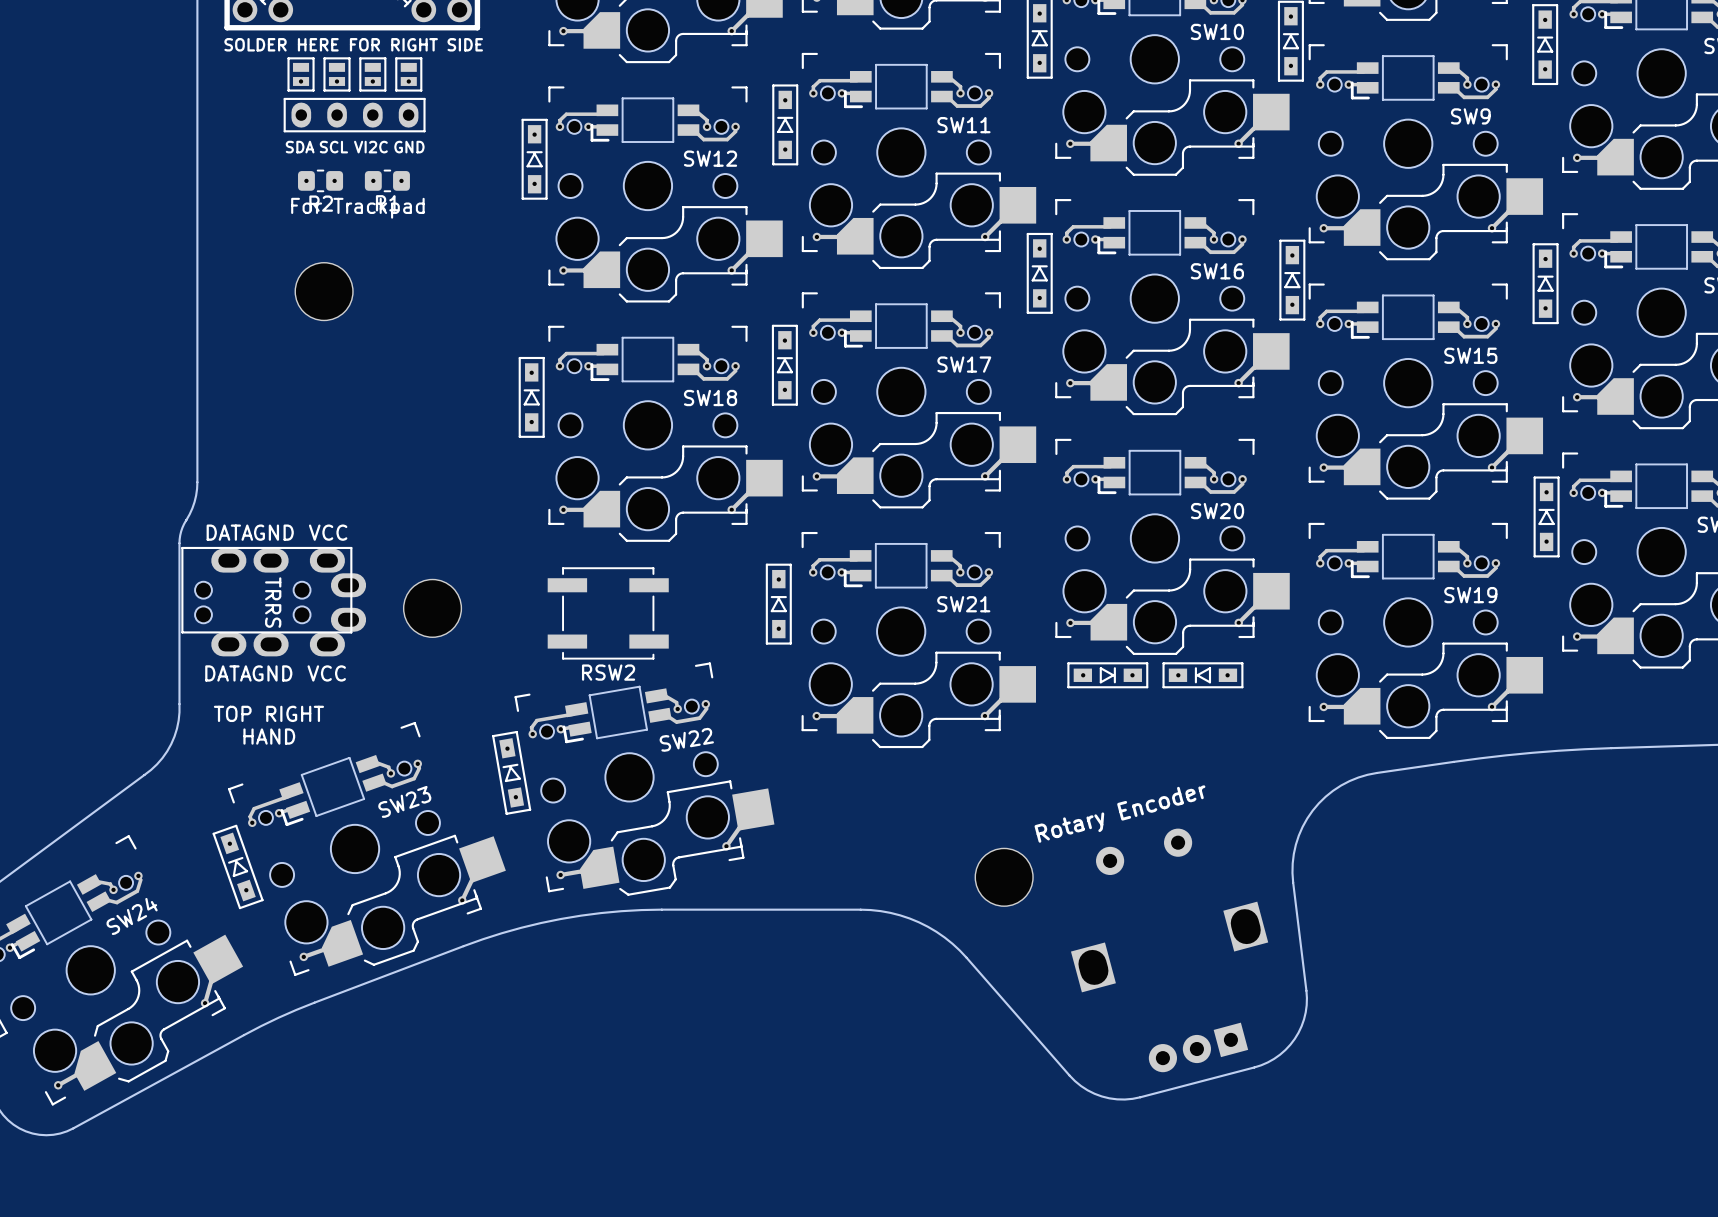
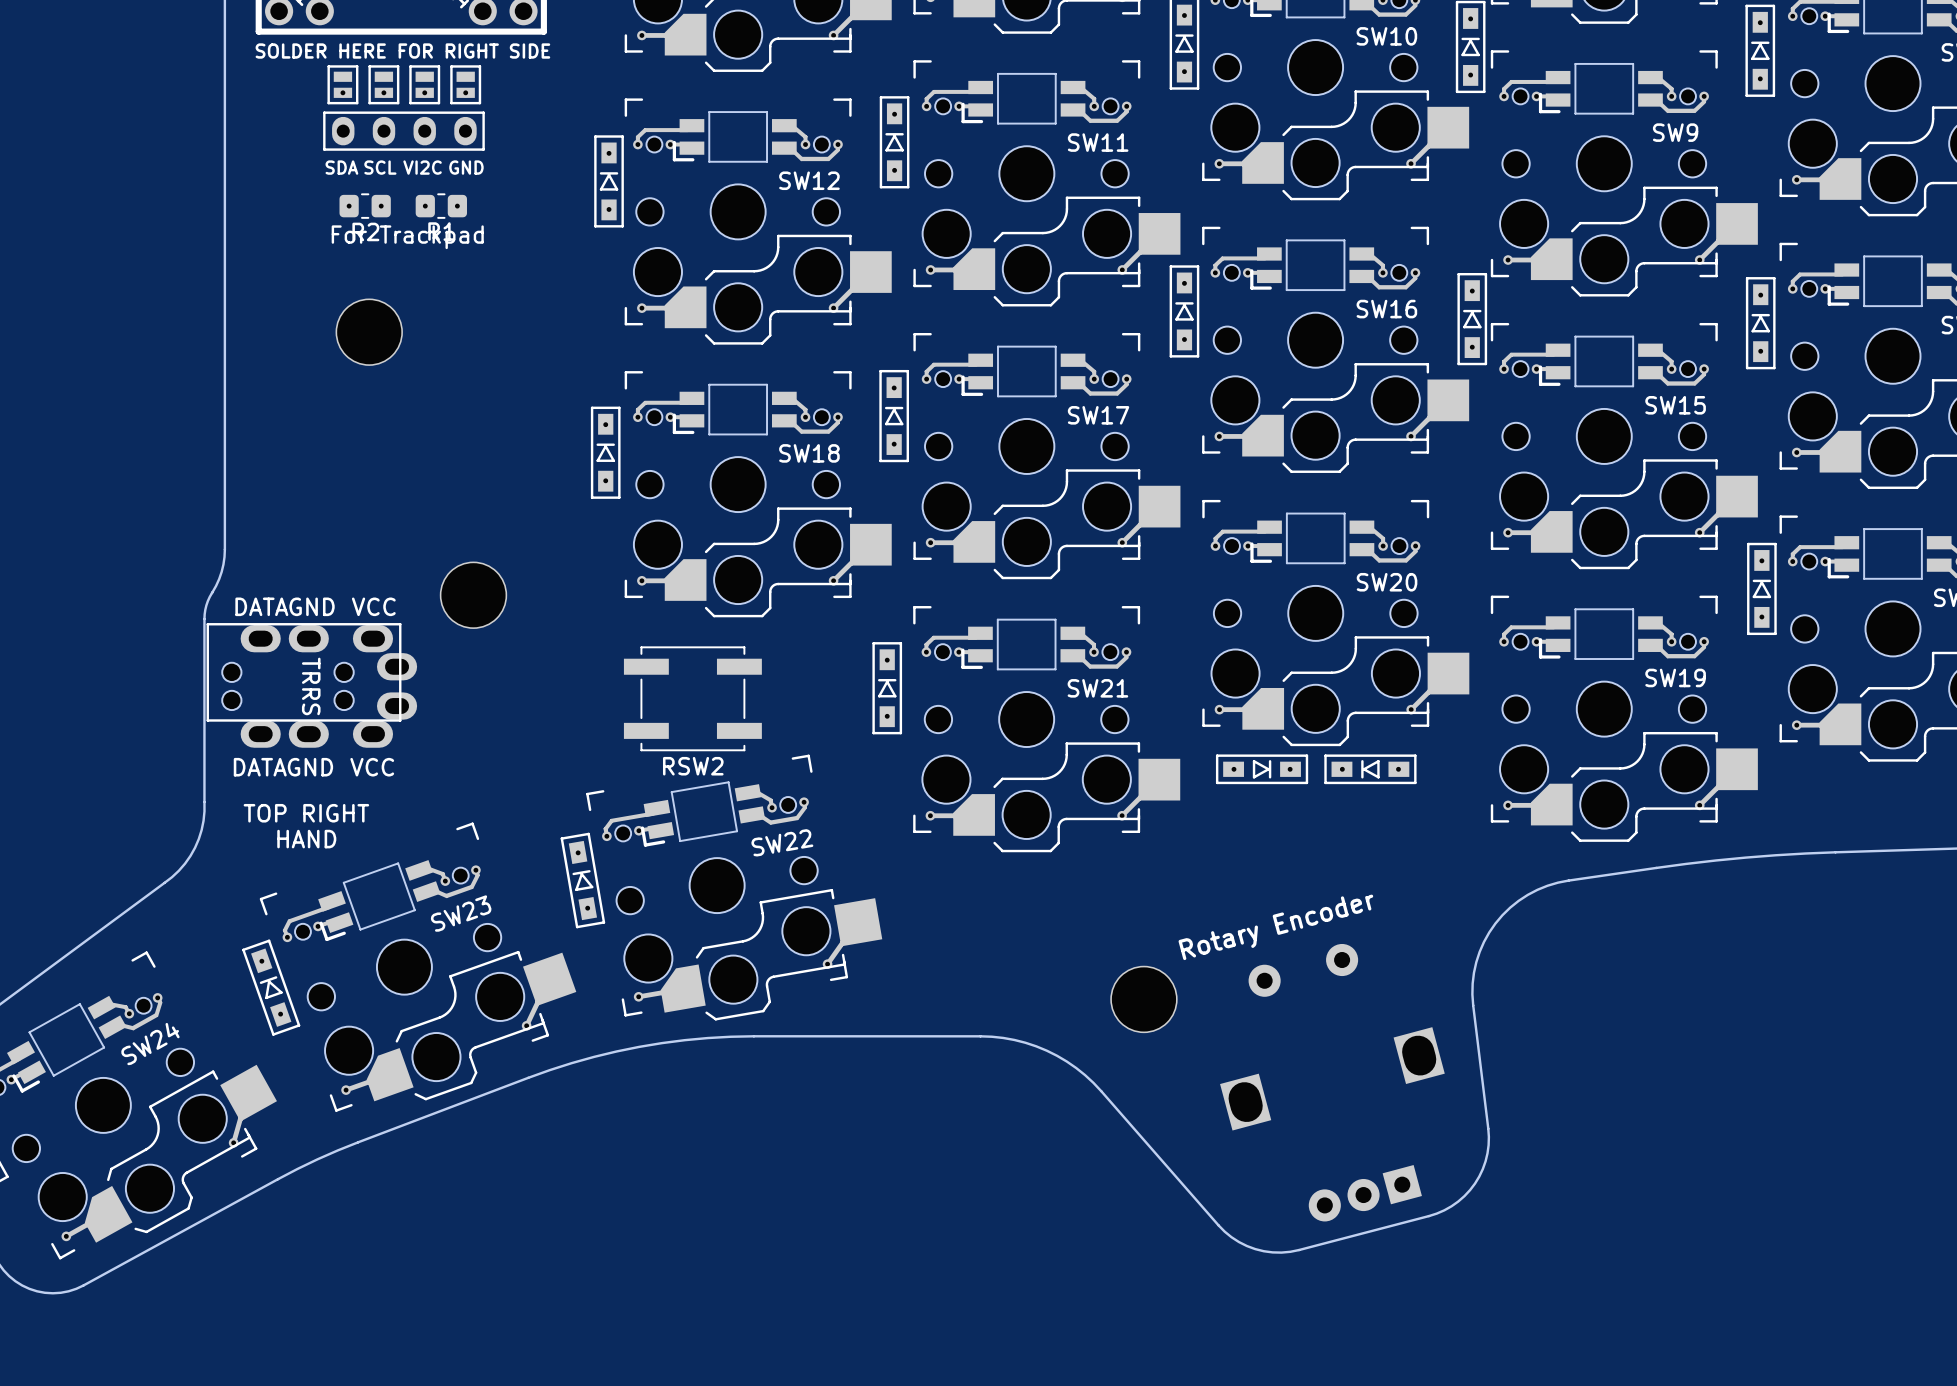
part position: (432, 608) -> (473, 595)

